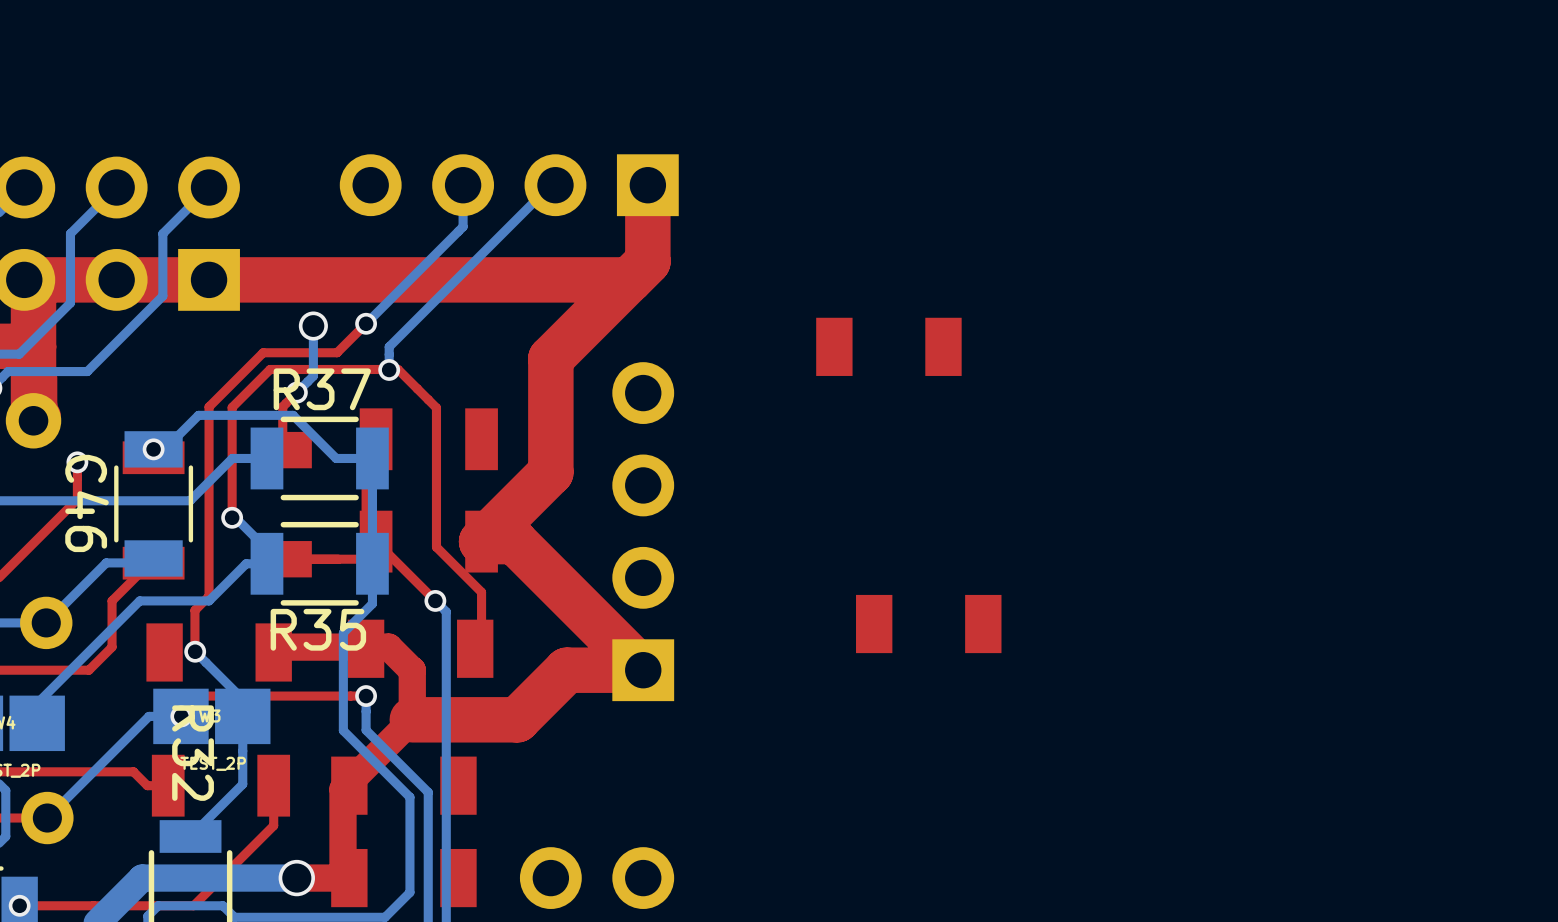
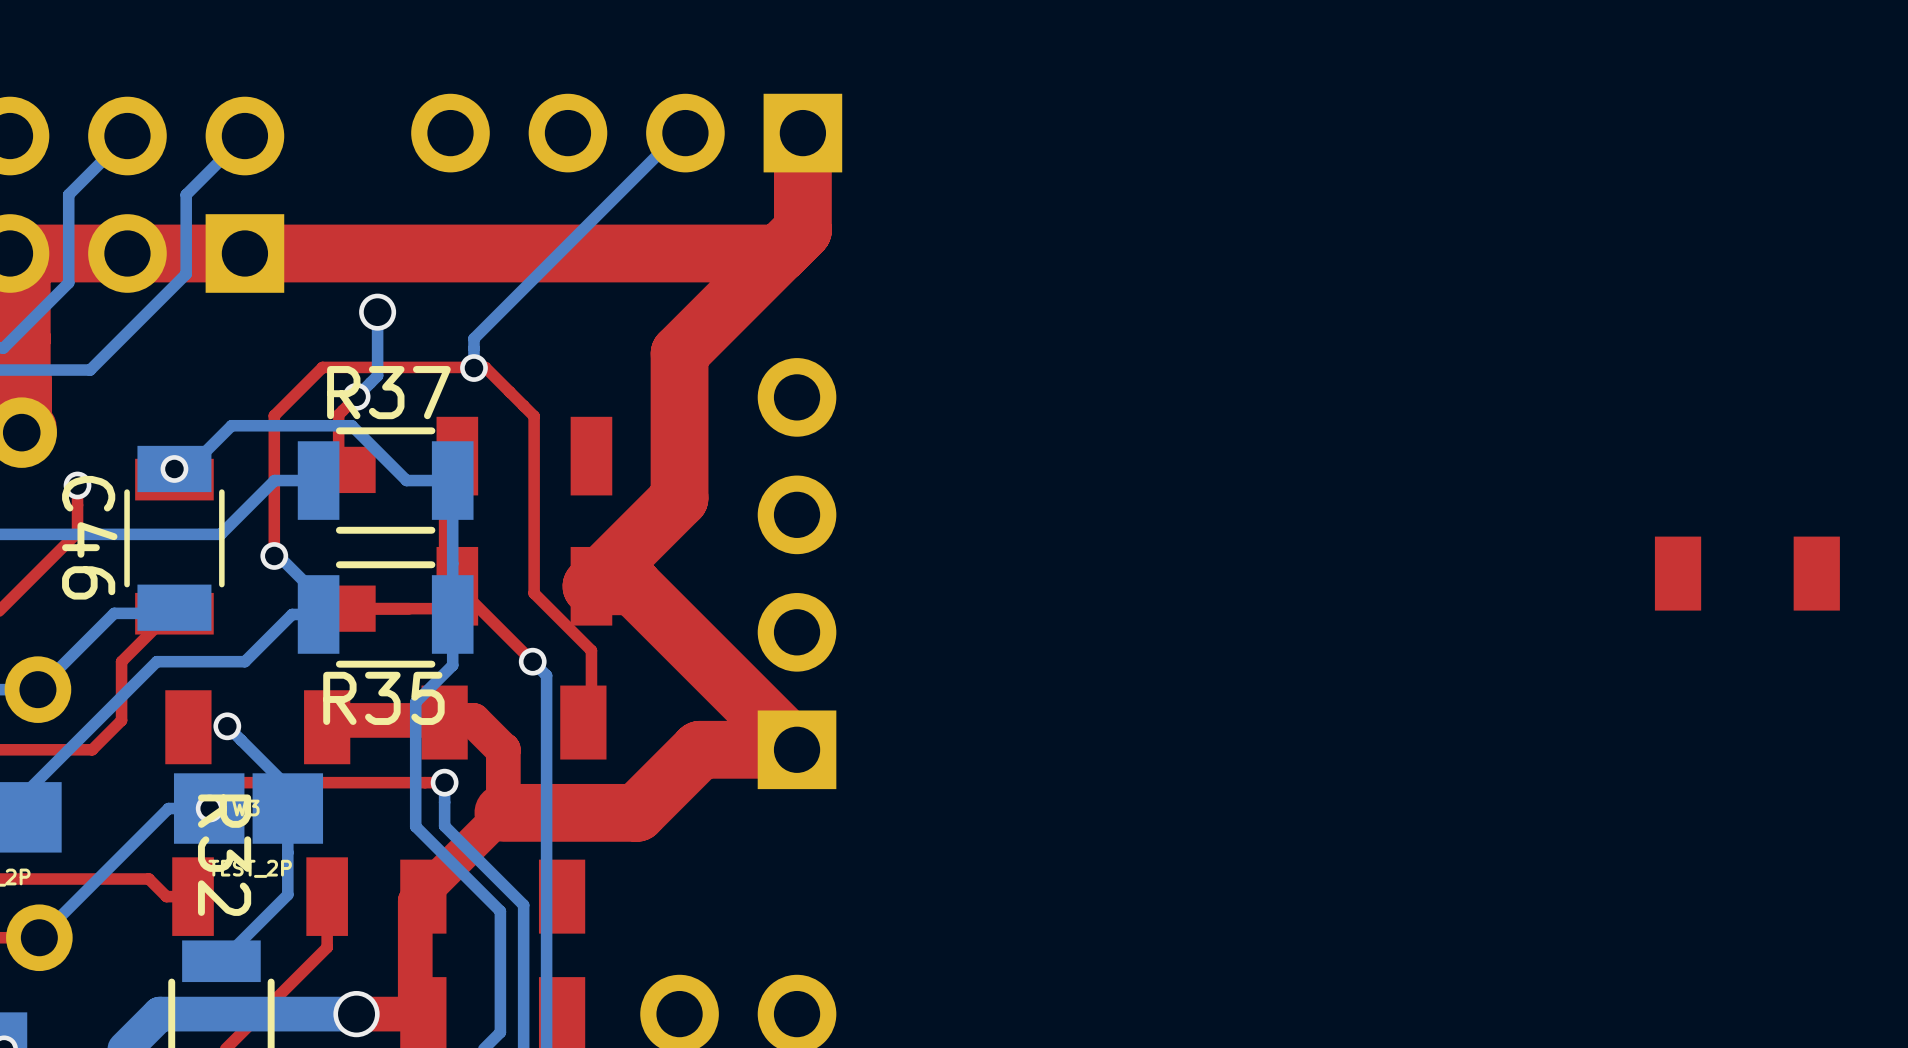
bottom track: (463, 185) (463, 226) (366, 323) -> none
top track: (366, 323) (337, 352) (263, 352) (209, 406) (209, 596) (194, 610) (195, 652) -> none
via: (366, 323) -> none
part: (888, 346) -> none
part: none -> (1747, 573)
part: (928, 624) -> none

